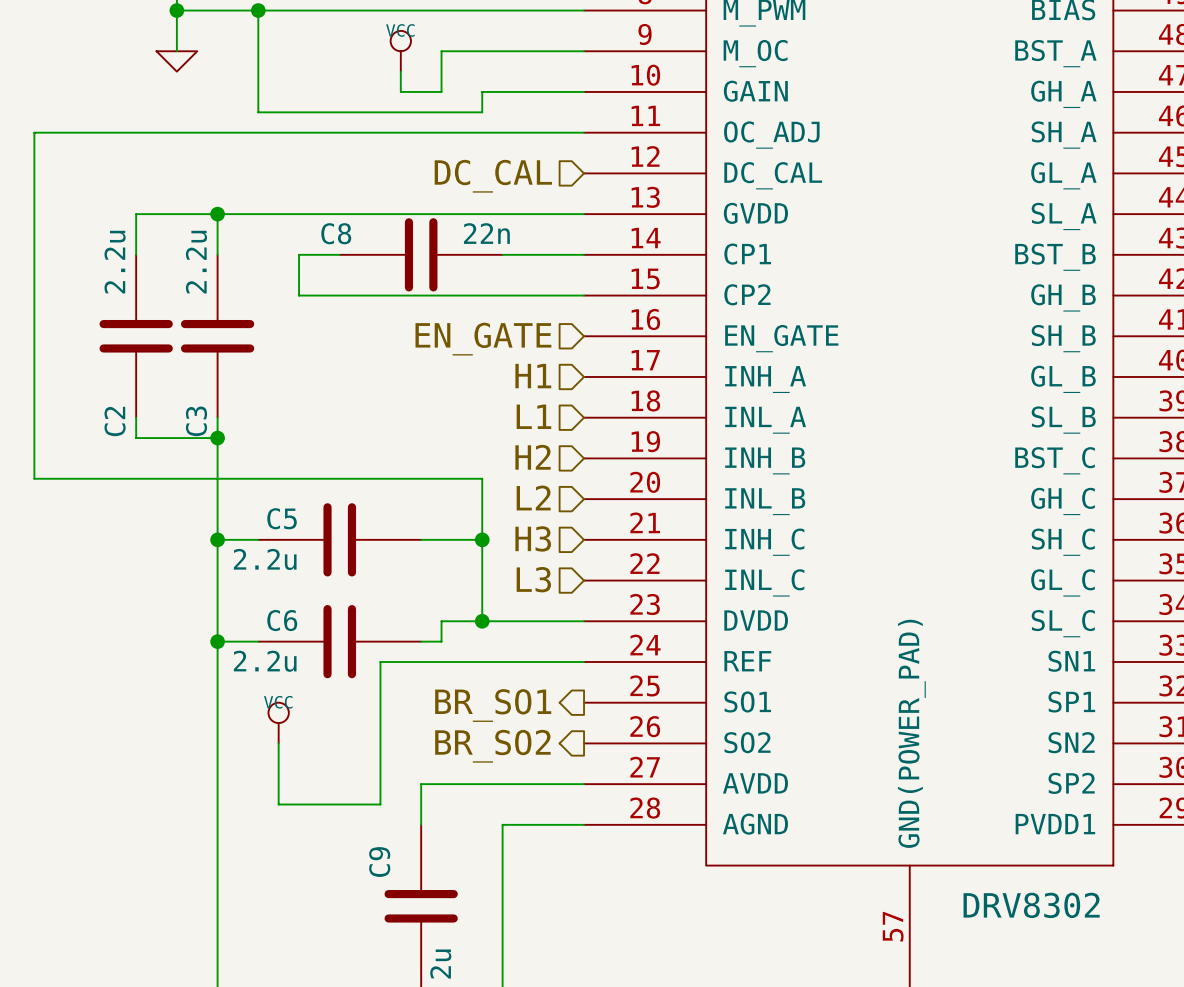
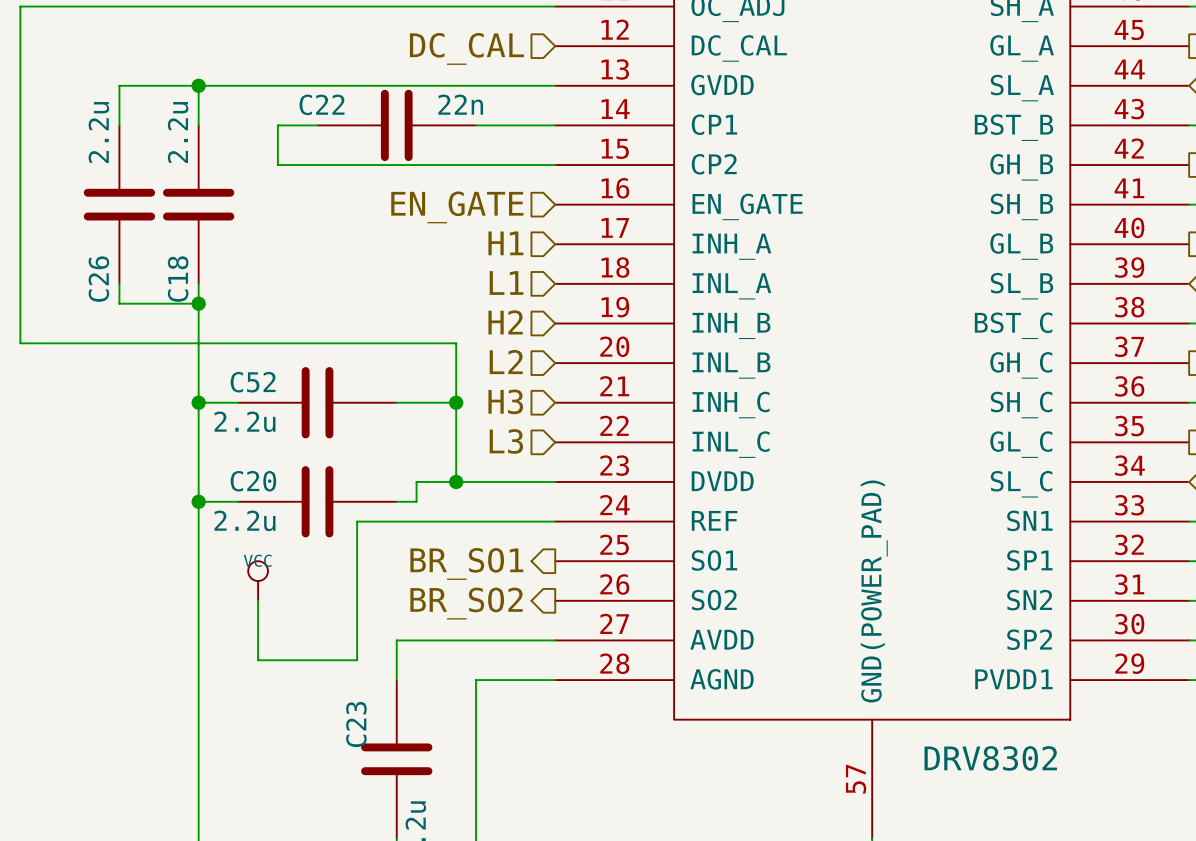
C8 name: C8 (336, 233) -> C22 (322, 104)
C2 name: C2 (115, 421) -> C26 (98, 279)
C3 name: C3 (196, 421) -> C18 (178, 279)
C5 name: C5 (282, 518) -> C52 (253, 382)
C6 name: C6 (282, 620) -> C20 (253, 481)
C9 name: C9 (379, 862) -> C23 (356, 724)

